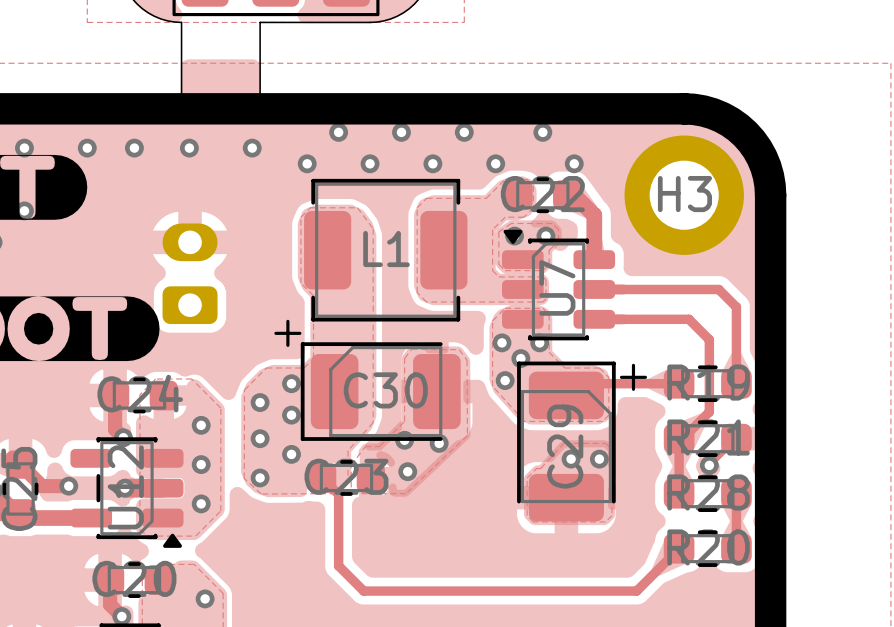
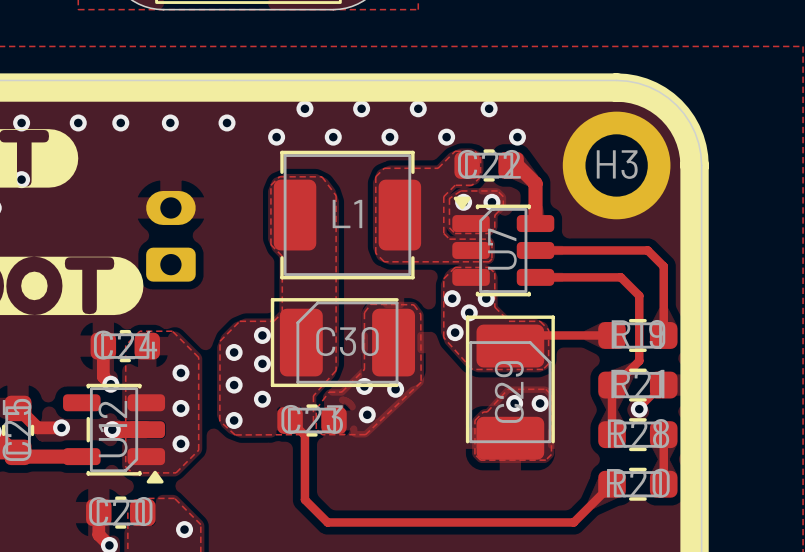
board edge: (181, 22) (181, 100) -> (163, 9) (234, 9)
board edge: (260, 22) (260, 100) -> (163, 80) (234, 80)
text: + (287, 333) -> none
text: + (633, 377) -> none

